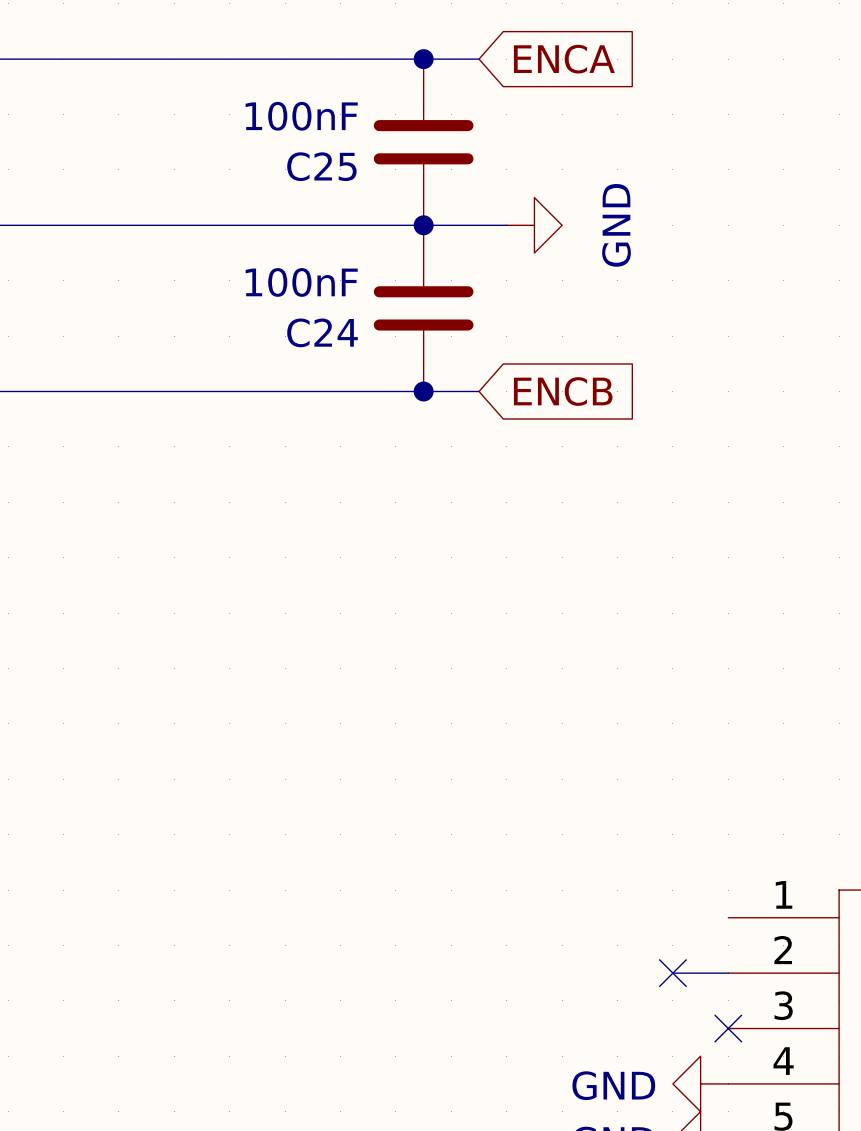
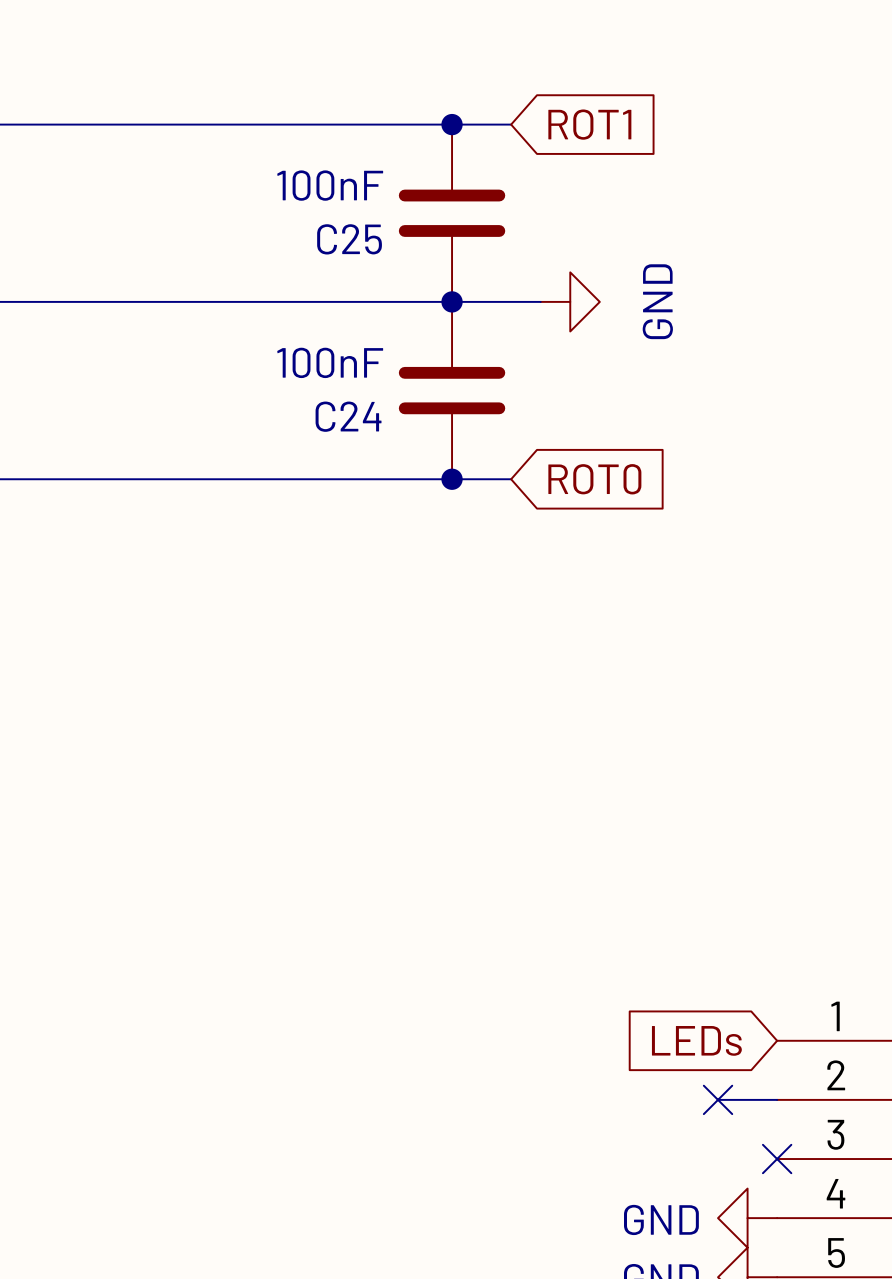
global label: ENCA (564, 59) -> ROT1 (589, 124)
global label: ENCB (563, 391) -> ROT0 (594, 479)
global label: none -> LEDs (696, 1040)

